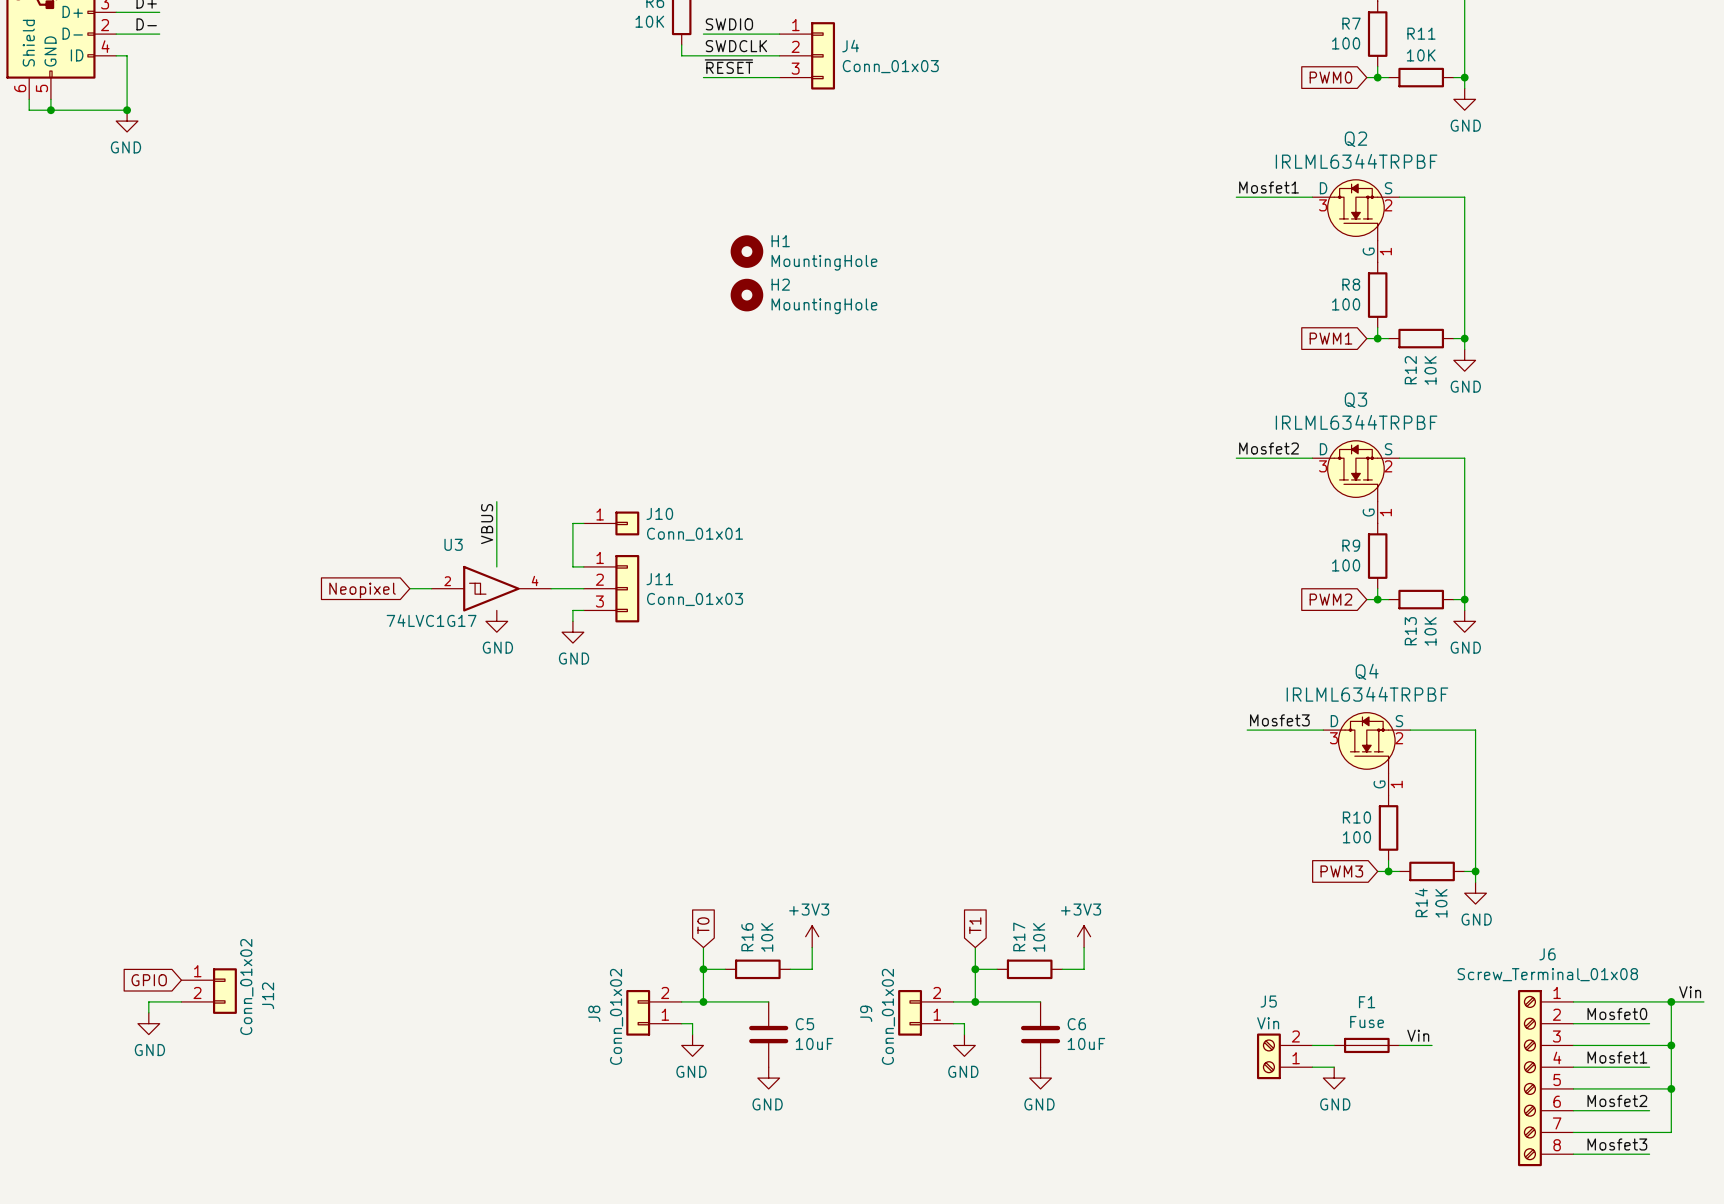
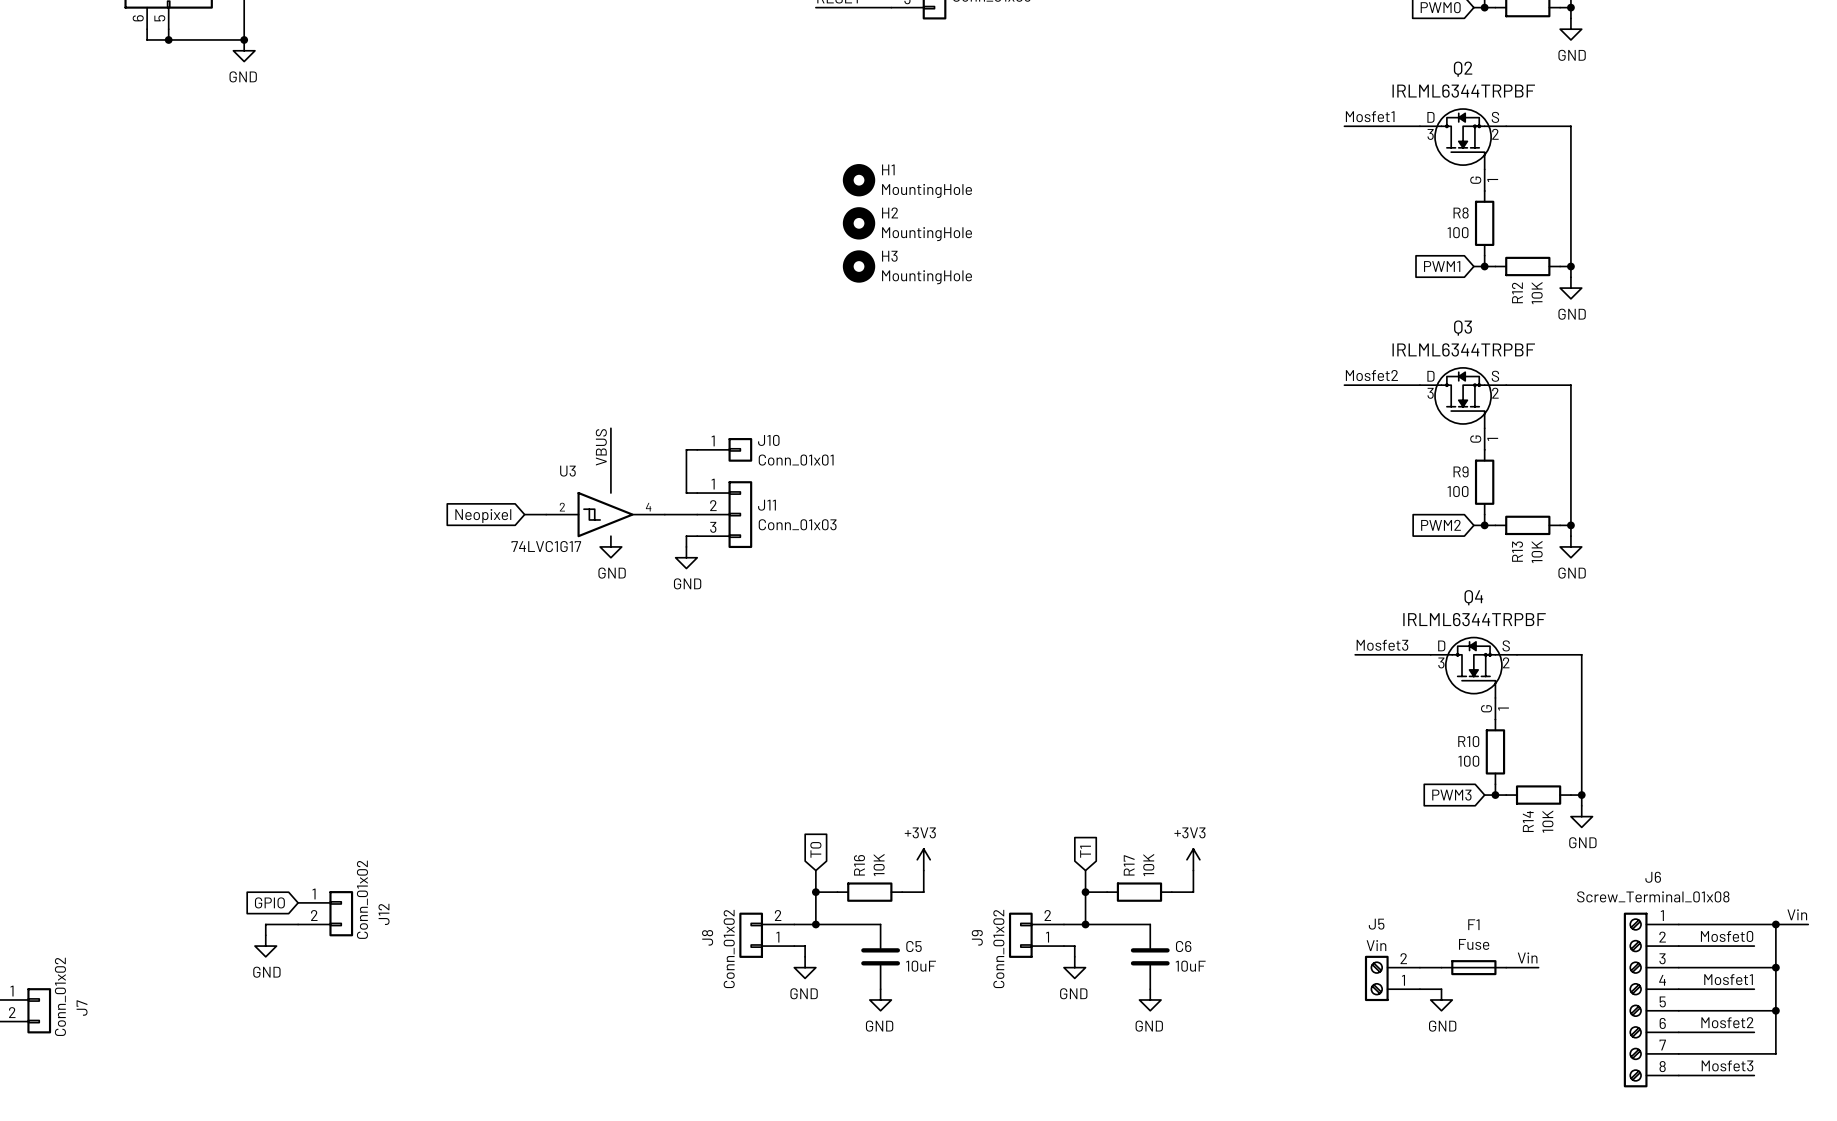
H3: none -> MountingHole (859, 266)

